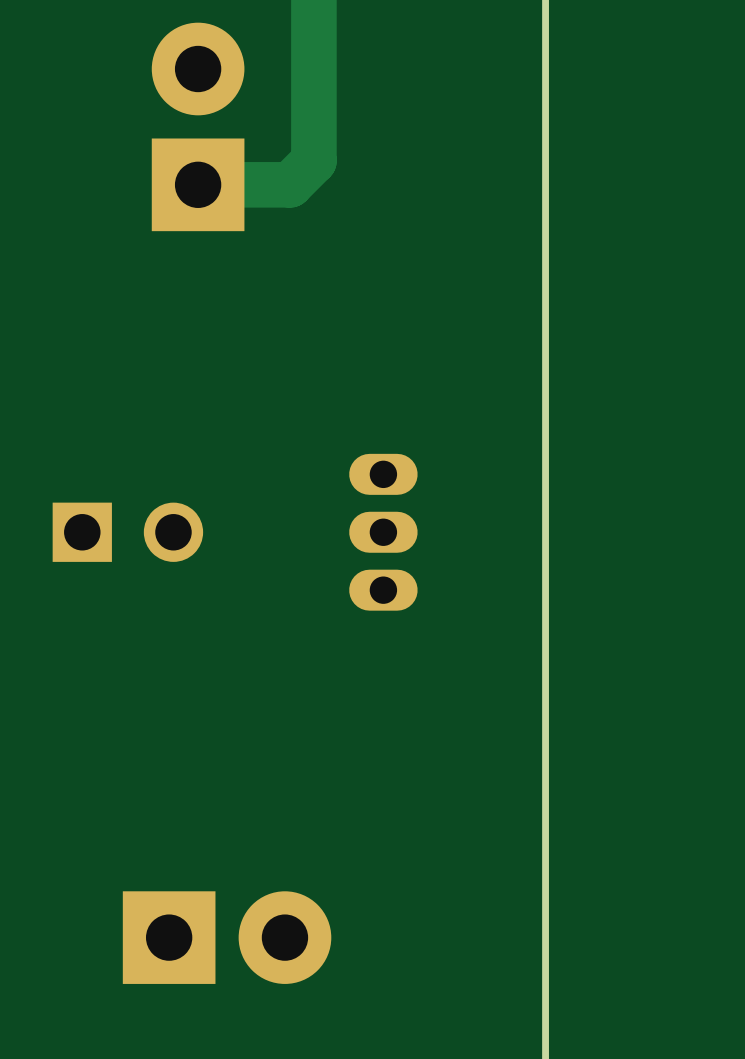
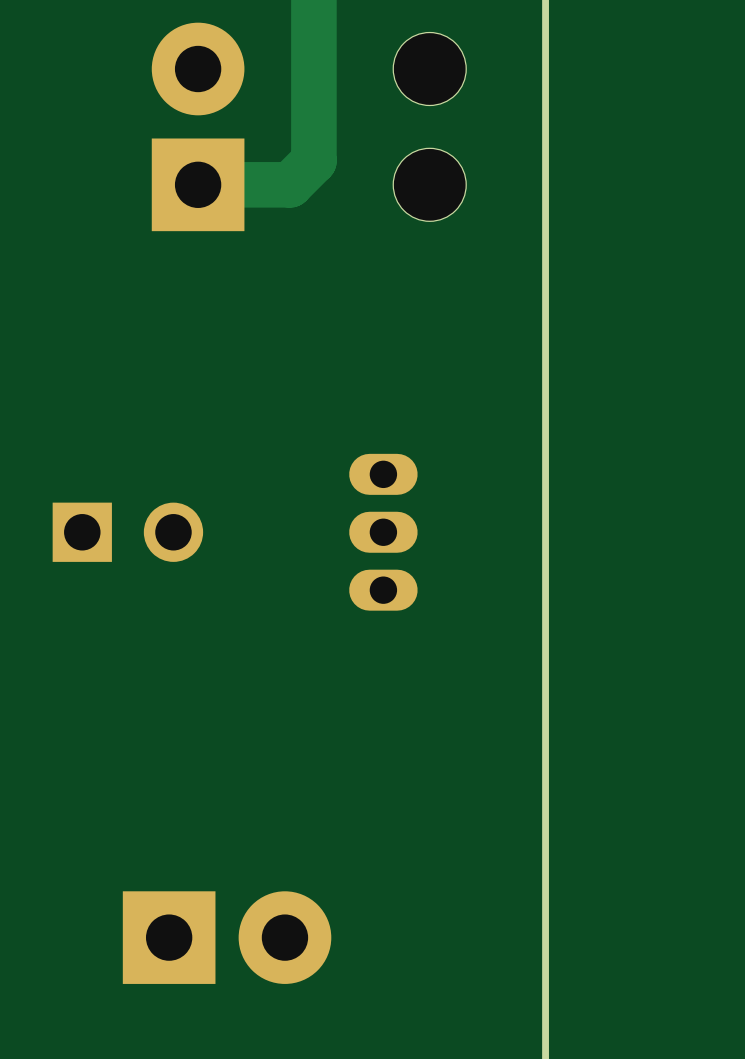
part: none -> (429, 69)
part: none -> (429, 184)

